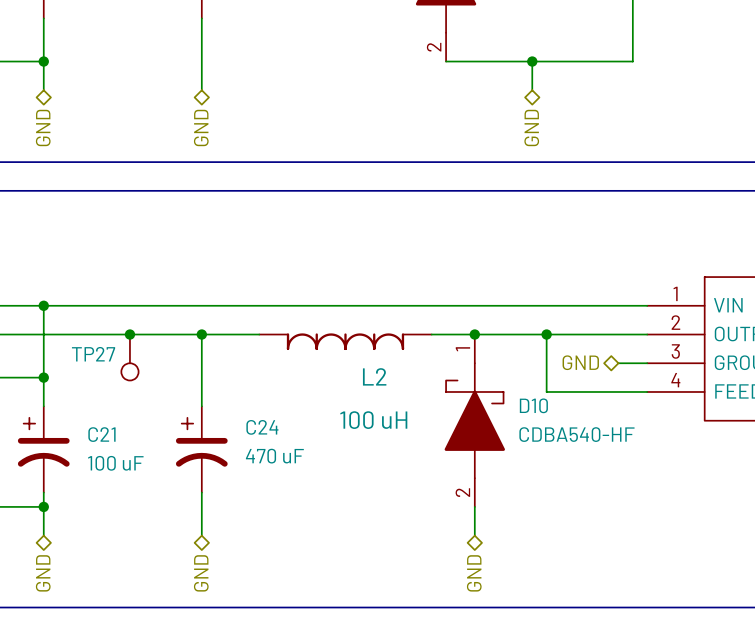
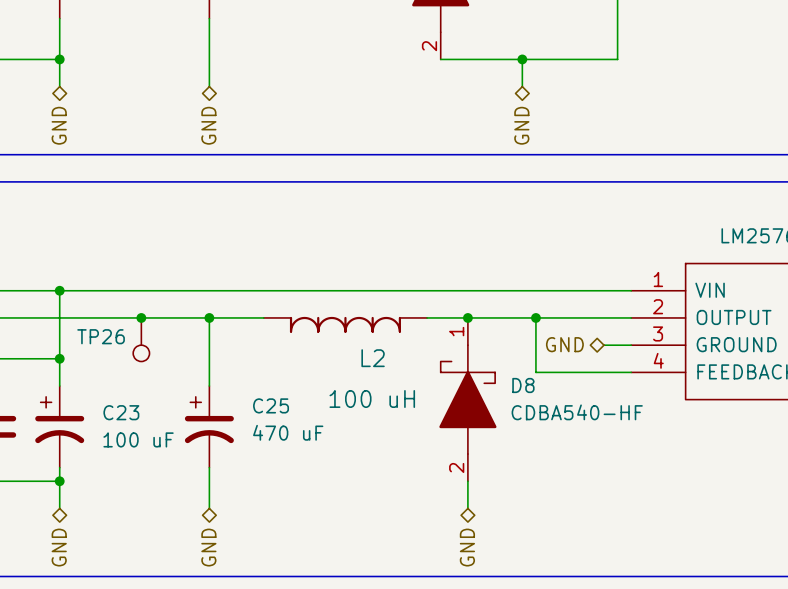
TP27 name: TP27 (93, 354) -> TP26 (101, 336)
D10 name: D10 (533, 405) -> D8 (523, 385)
C24 name: C24 (262, 427) -> C25 (271, 405)
C21 name: C21 (101, 434) -> C23 (121, 412)

